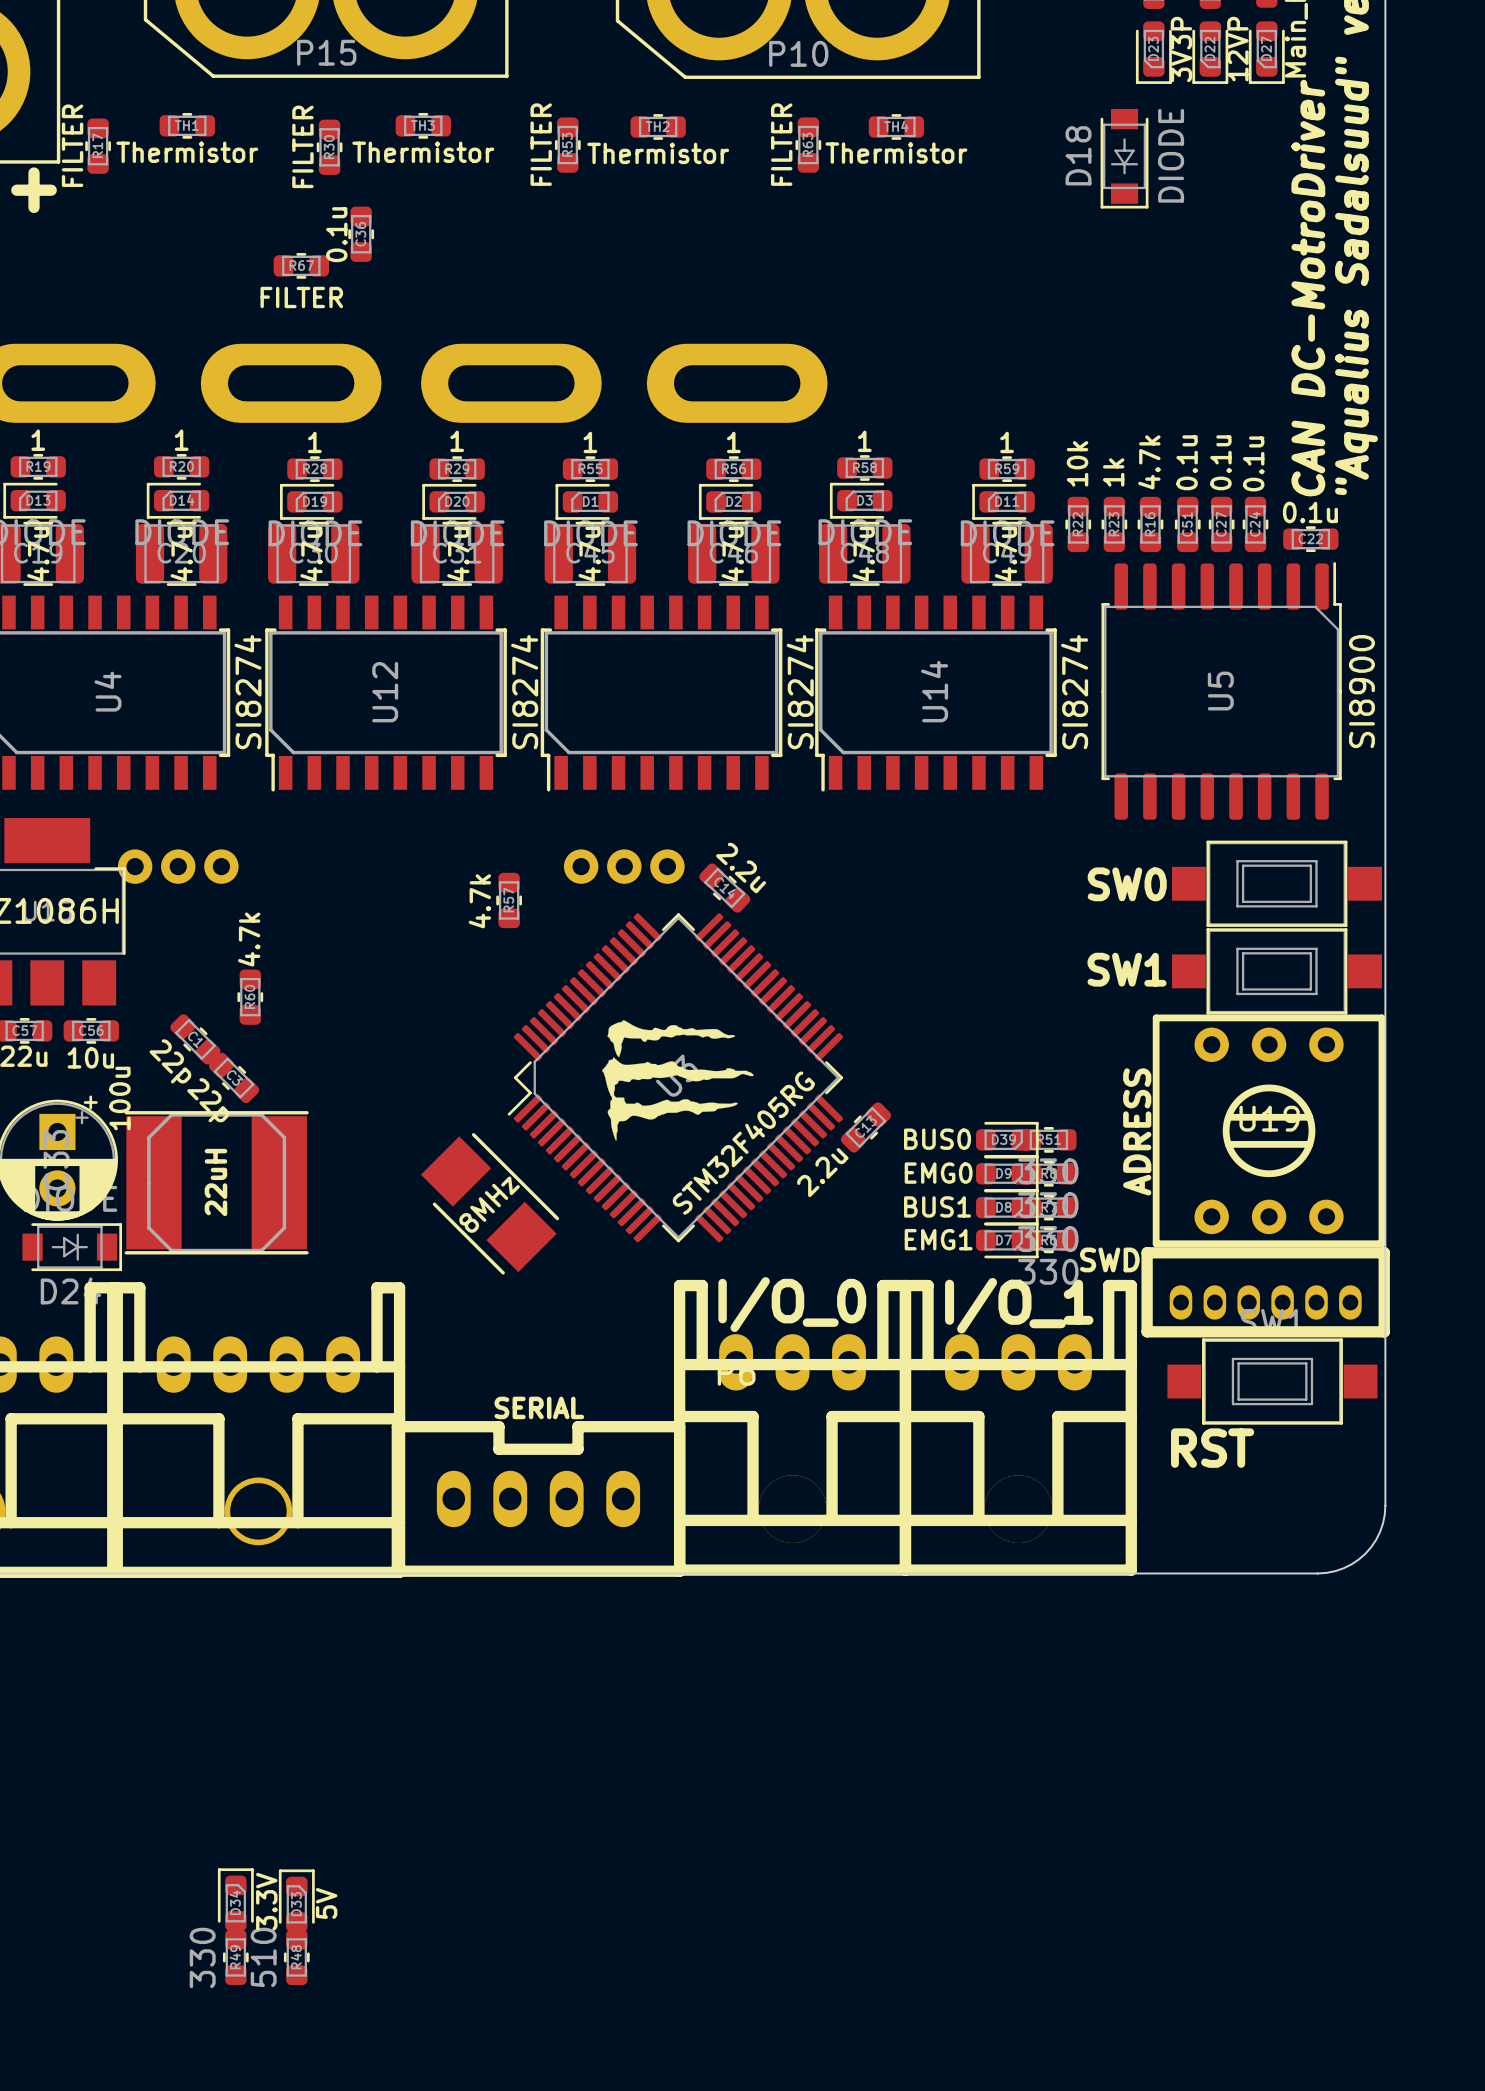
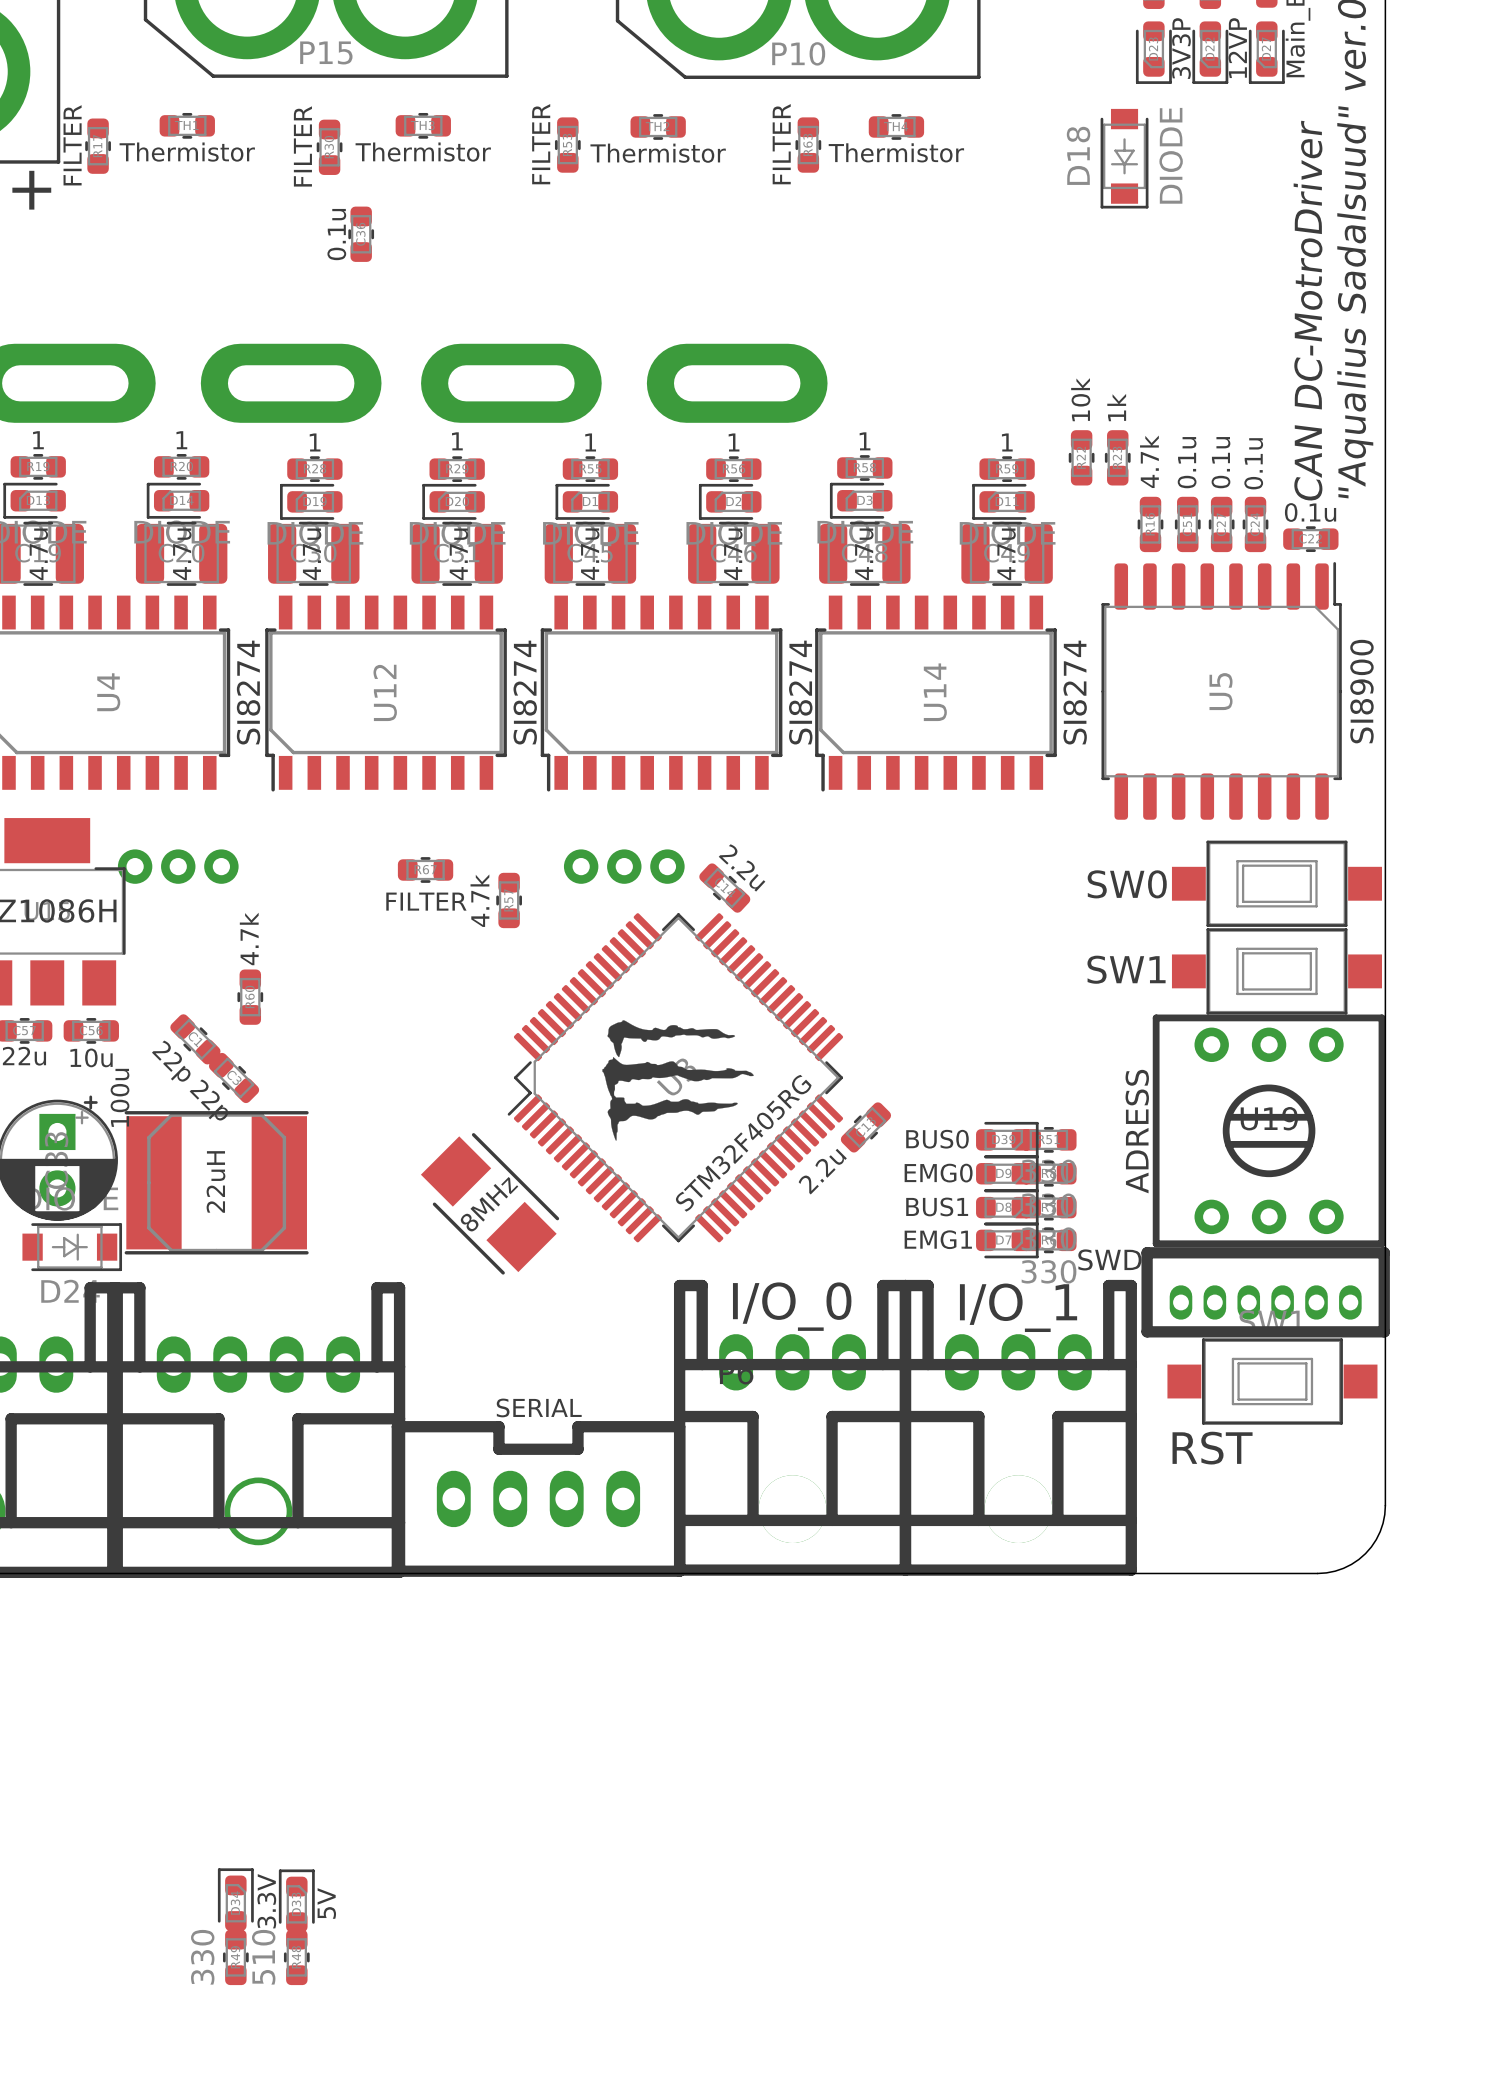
R67 position: (301, 265) -> (425, 869)
R22 position: (1078, 524) -> (1081, 457)
R23 position: (1114, 524) -> (1117, 457)

